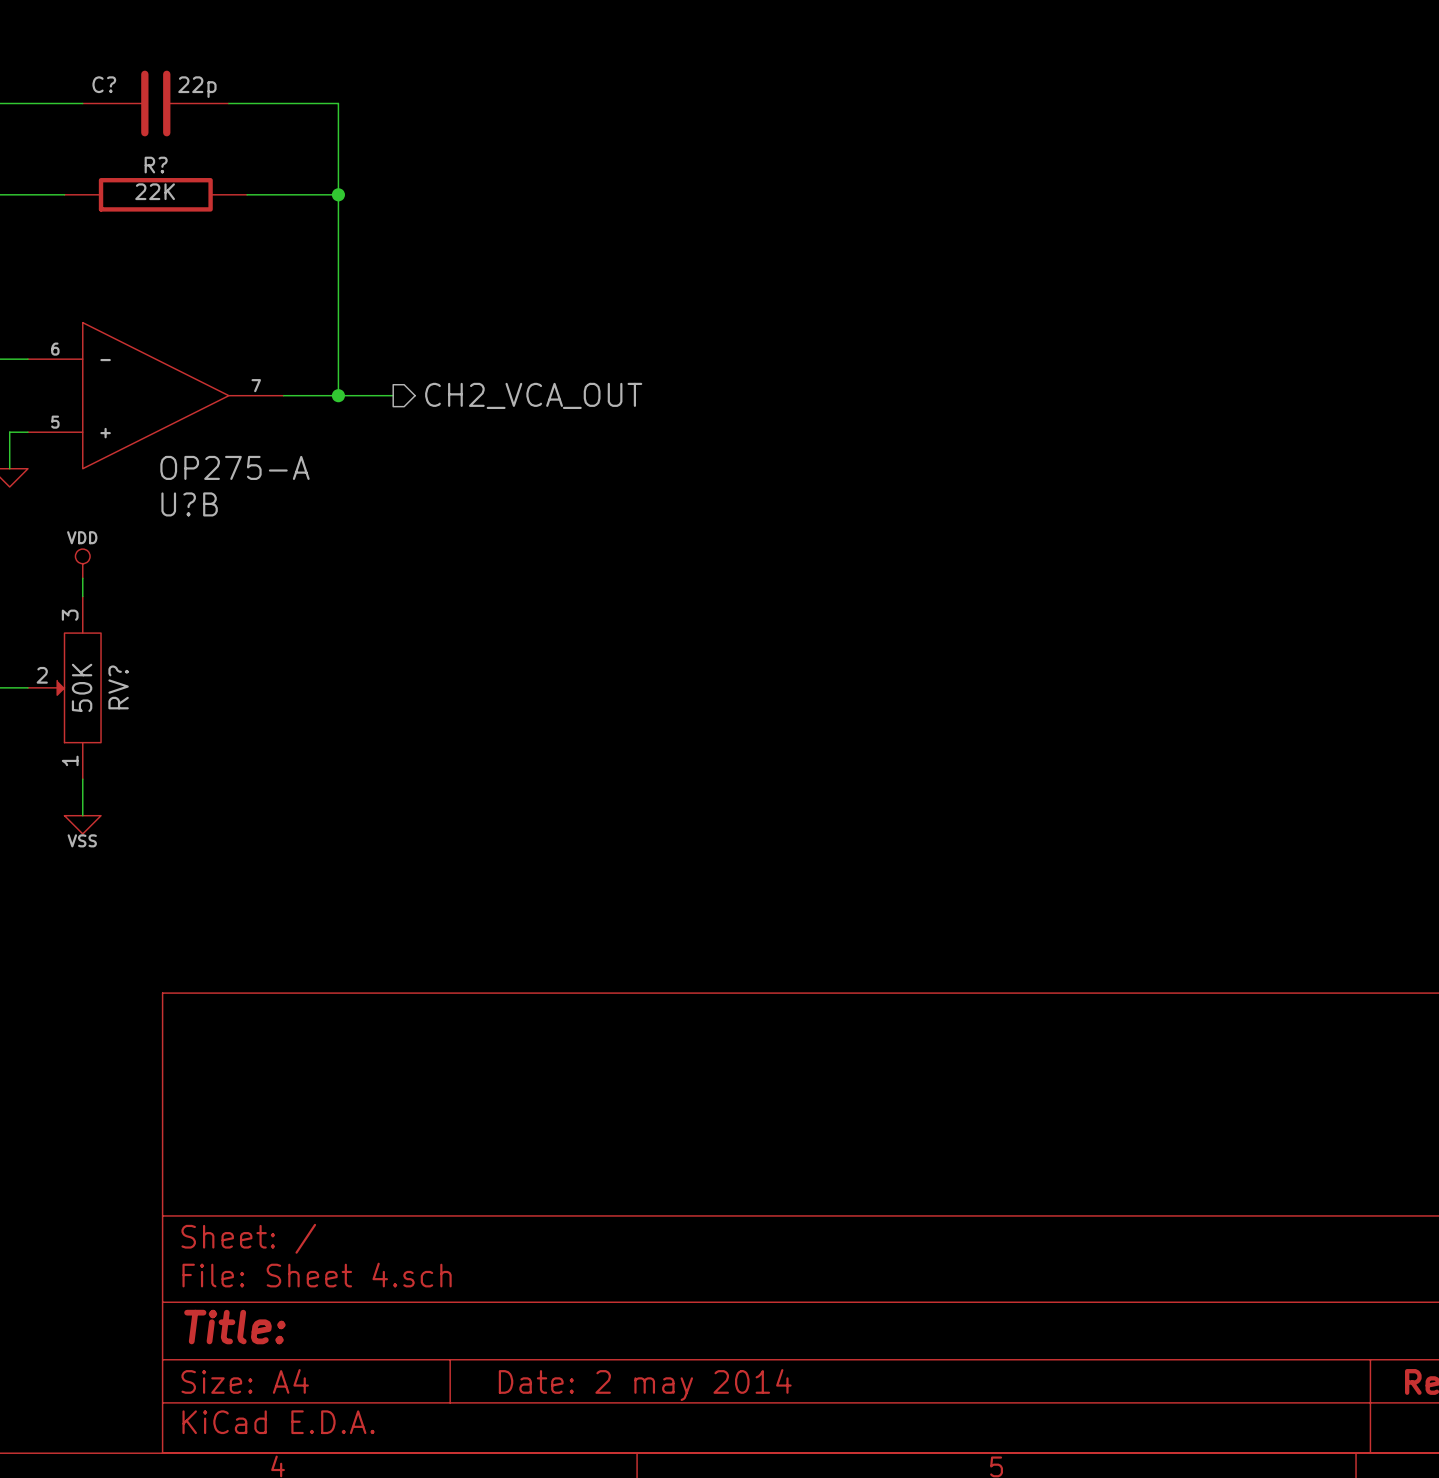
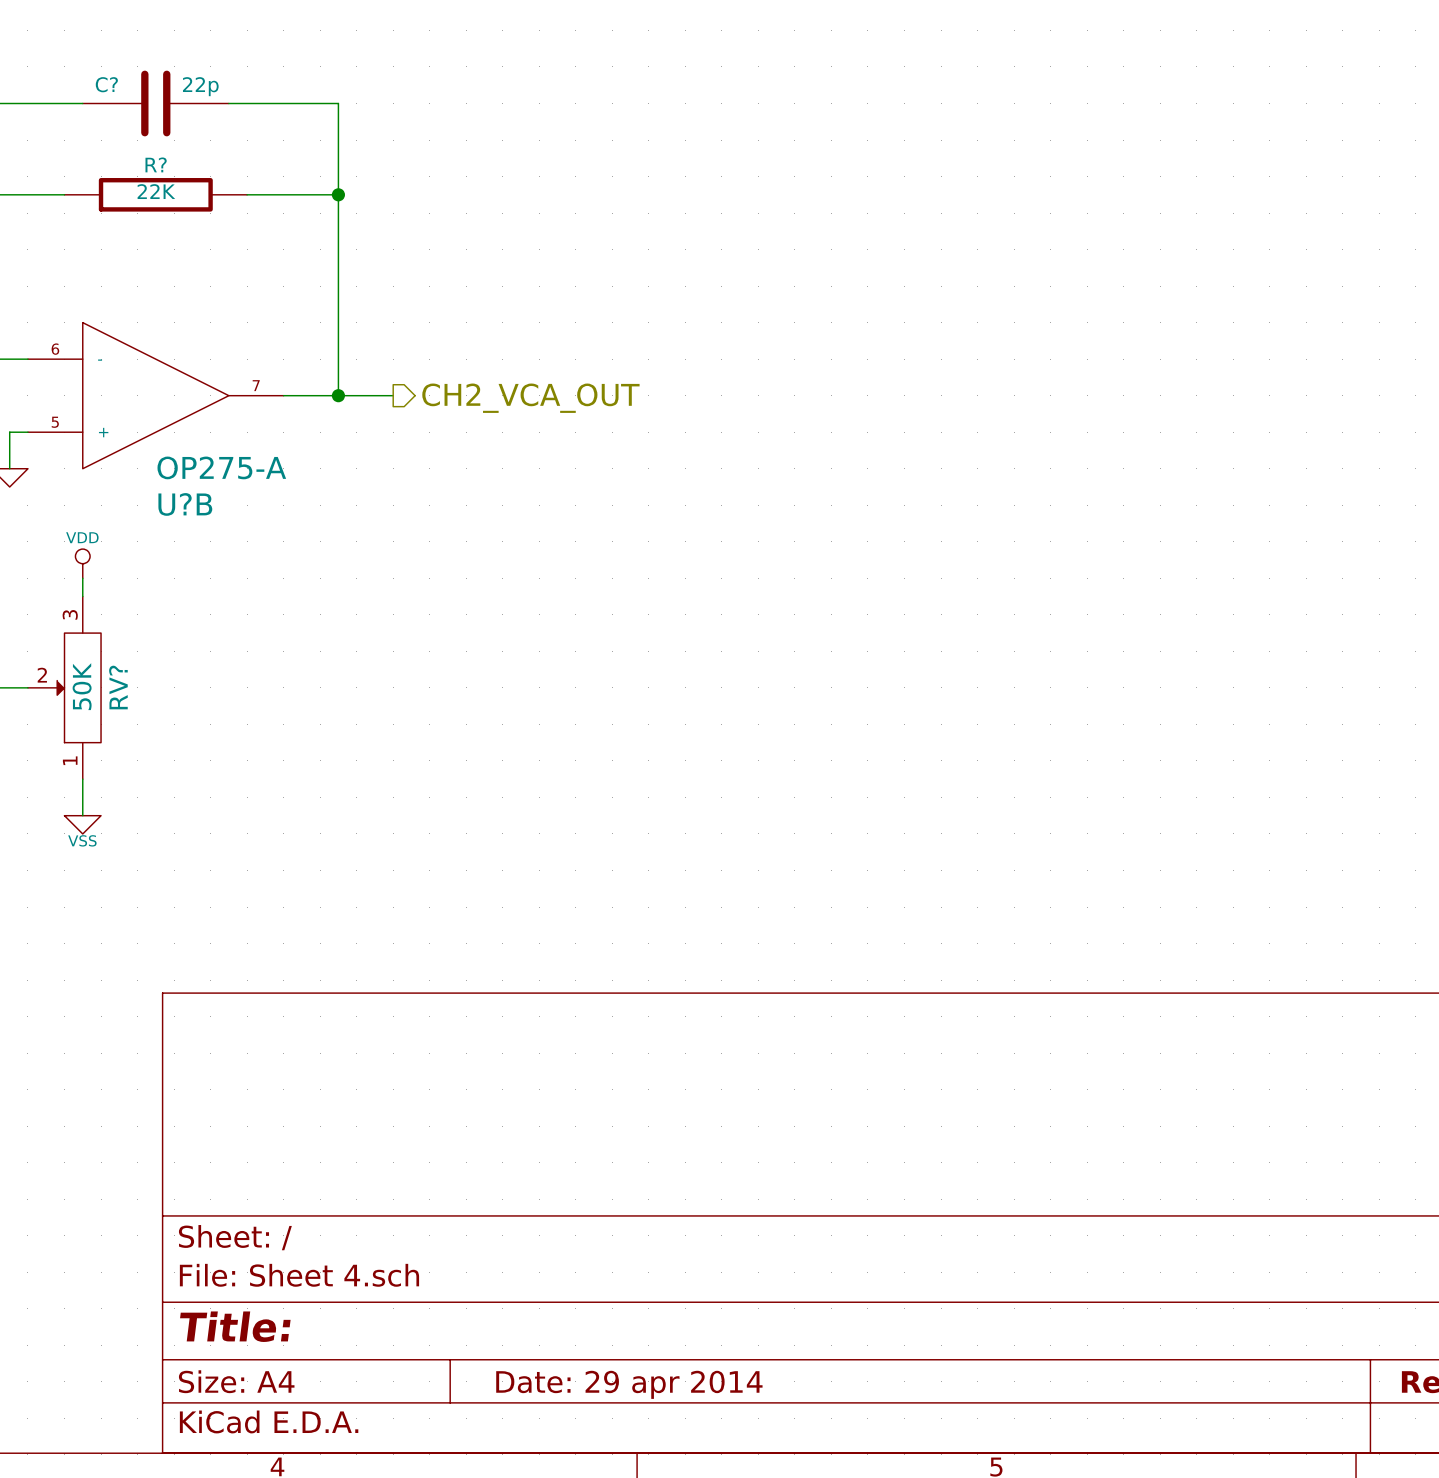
title block: Date: 2 may 2014 (645, 1385) -> Date: 29 apr 2014 (629, 1384)

